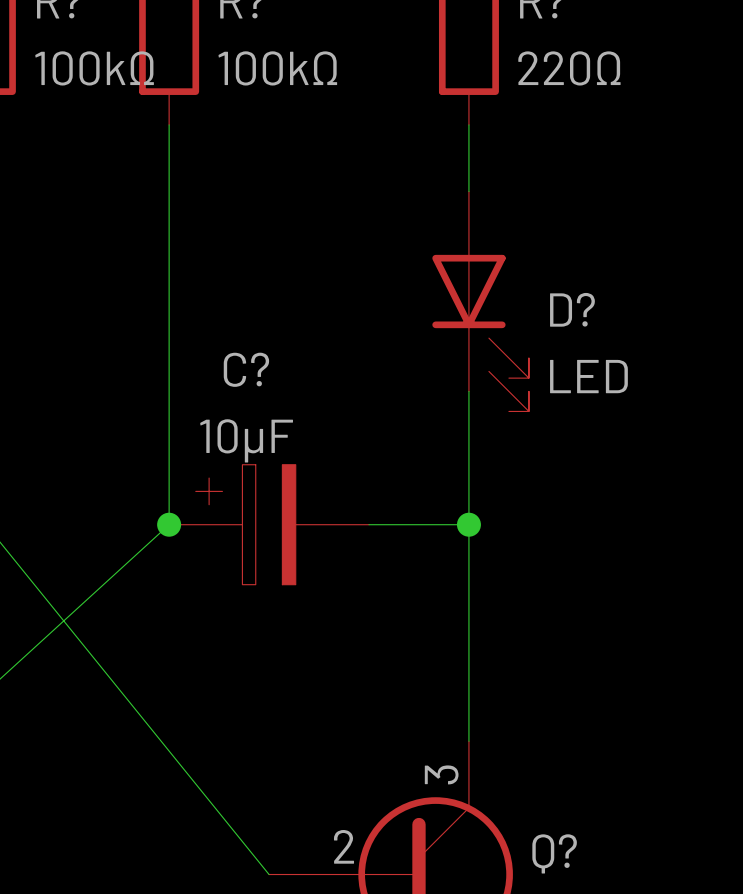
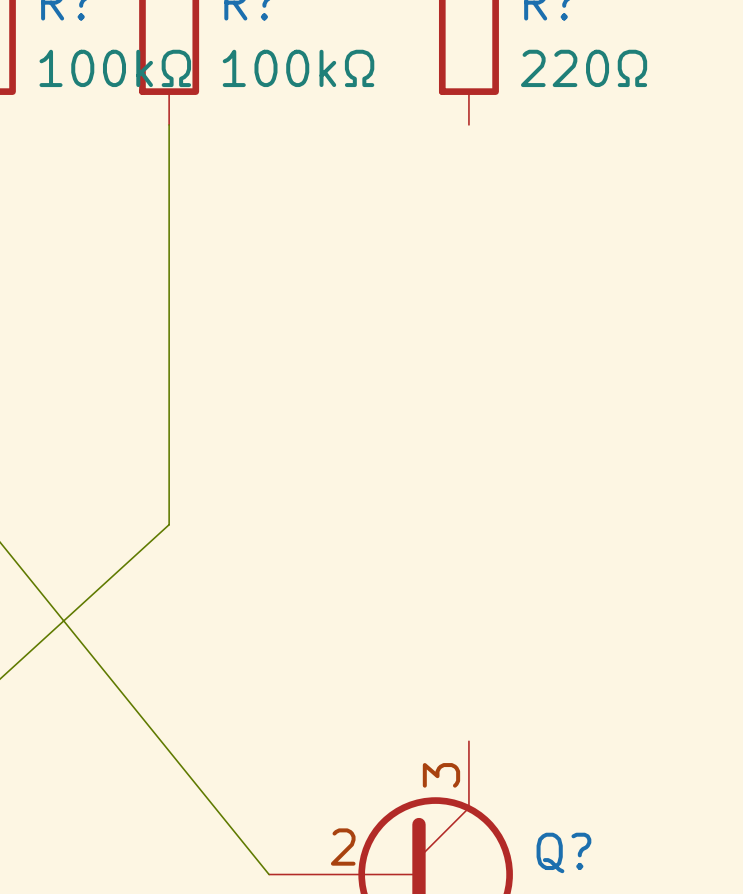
wire: (468, 124) (468, 191) -> none
D?: LED (480, 301) -> none
wire: (468, 391) (468, 741) -> none
junction: (169, 524) -> none
C?: 10μF (269, 524) -> none
wire: (369, 524) (468, 524) -> none
junction: (468, 524) -> none

